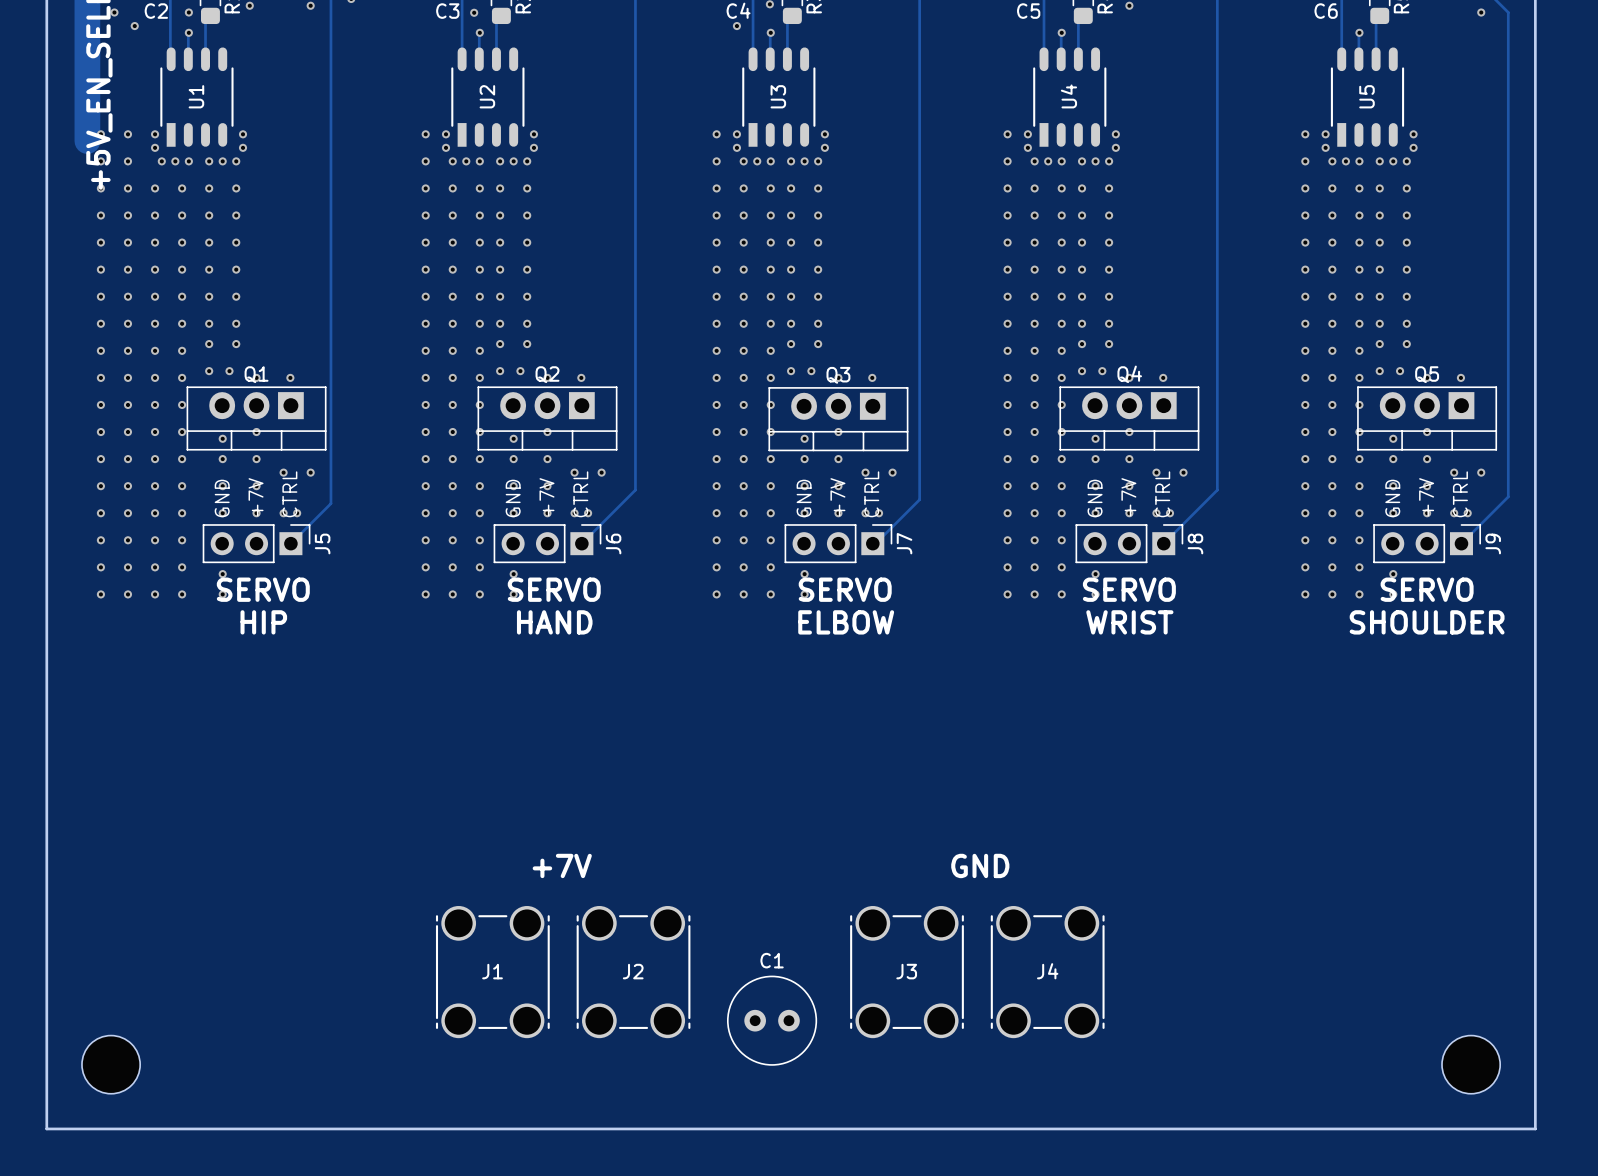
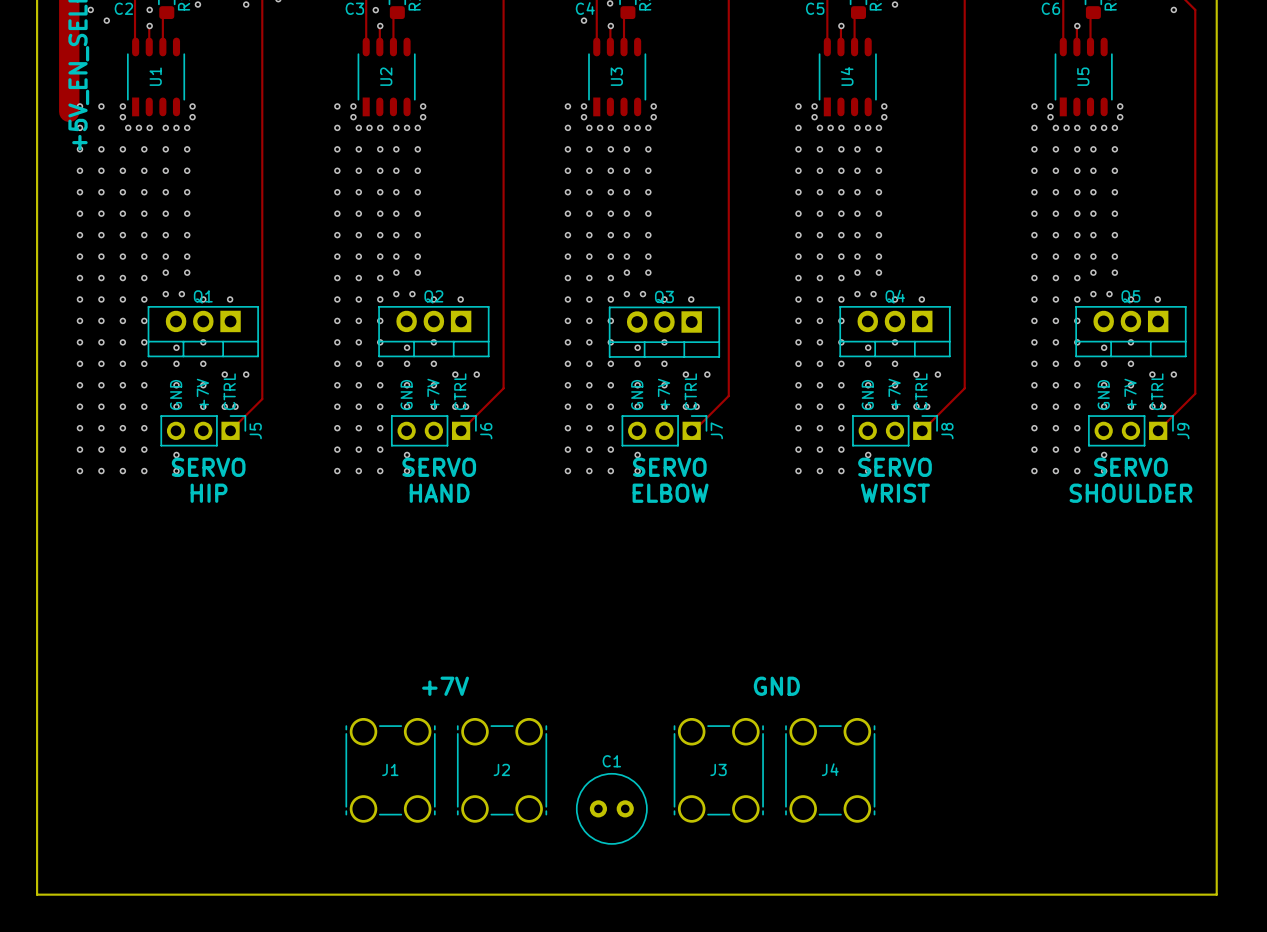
part: (111, 1064) -> none
part: (1471, 1064) -> none

